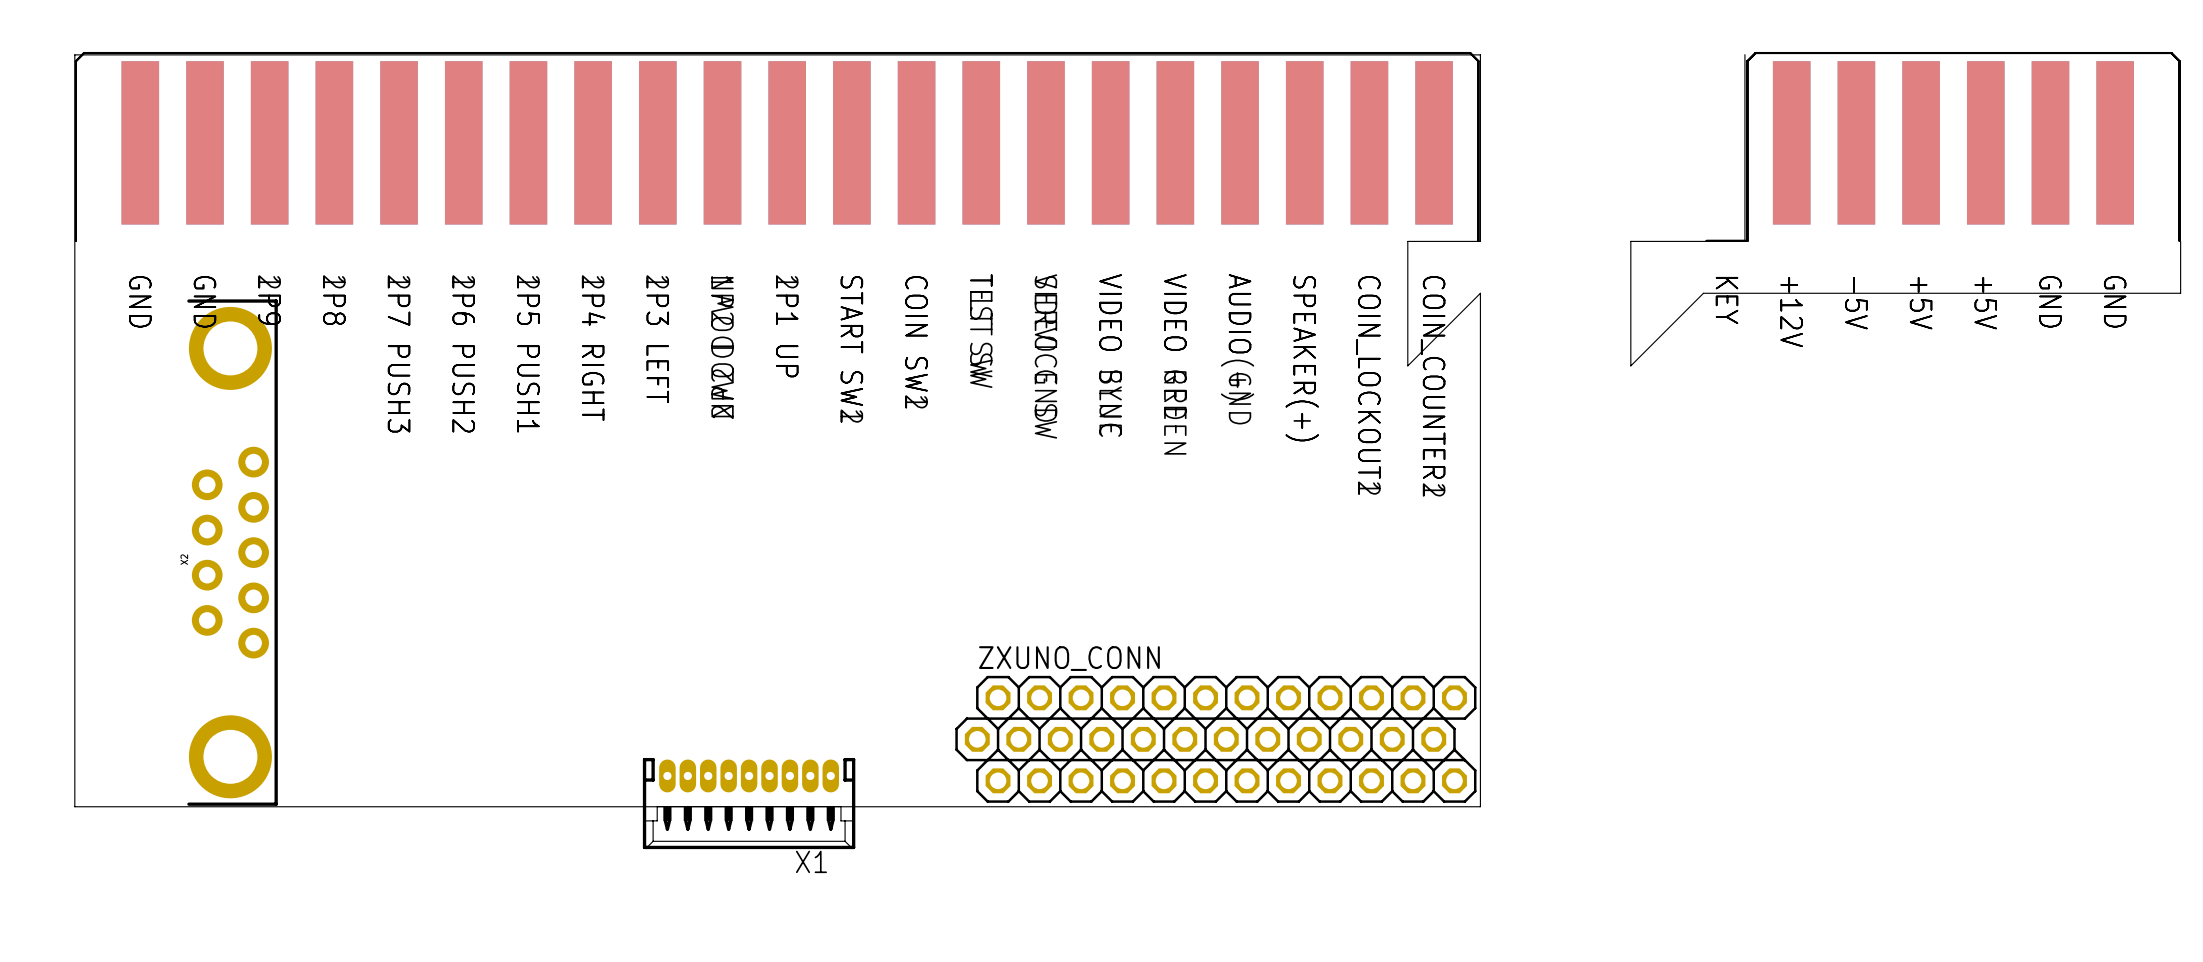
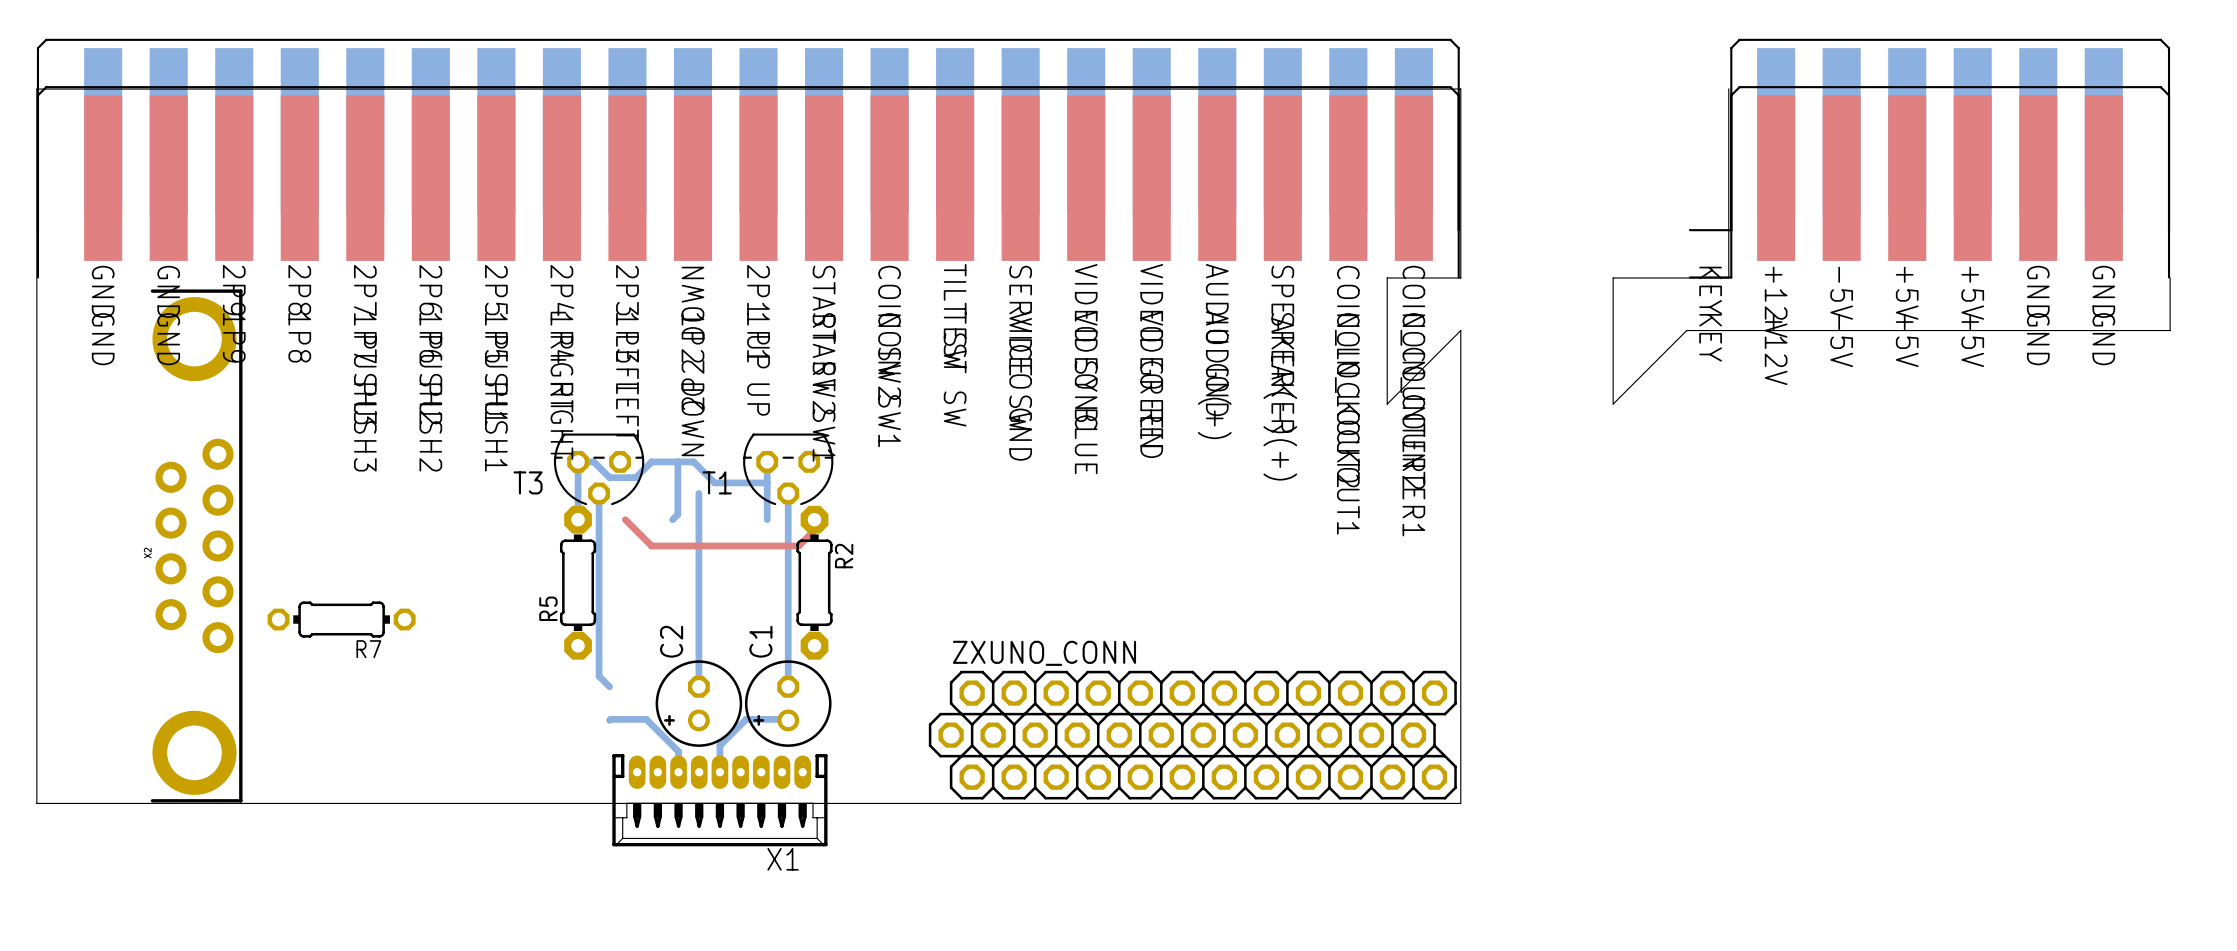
board edge: (1480, 54) (74, 54) (74, 101) -> (1460, 89) (36, 89)
board edge: (1480, 54) (1480, 101) -> none
board edge: (1744, 54) (1744, 101) -> none
part position: (777, 146) -> (748, 182)
part position: (1943, 146) -> (1929, 182)
board edge: (1480, 241) (1407, 241) (1407, 288) -> (1460, 230) (1460, 278) (1387, 278)
board edge: (1744, 241) (1630, 241) (1630, 288) -> (1728, 230) (1728, 278) (1613, 278)
board edge: (2180, 241) (2180, 288) -> none
board edge: (2180, 293) (1703, 293) (1630, 365) -> (2170, 283) (2170, 330) (1686, 330) (1613, 404) (1613, 356)
board edge: (1480, 339) (1480, 293) (1407, 365) -> (1460, 330) (1387, 404) (1387, 356)
bottom track: none -> (677, 461) (677, 514) (672, 519)
bottom track: none -> (767, 461) (767, 519)
T3: none -> (599, 469)
T1: none -> (788, 469)
bottom track: none -> (767, 482) (714, 482) (693, 461) (651, 461) (635, 477) (609, 477) (593, 461) (578, 461) (578, 519)
bottom track: none -> (599, 493) (599, 676) (609, 686)
bottom track: none -> (698, 493) (698, 686)
bottom track: none -> (788, 493) (788, 686)
top track: none -> (625, 519) (651, 545) (798, 545) (814, 530) (814, 519)
R5: none -> (578, 582)
R2: none -> (814, 582)
R7: none -> (341, 619)
C2: none -> (698, 703)
C1: none -> (788, 703)
bottom track: none -> (609, 720) (646, 719) (678, 751) (678, 772)
bottom track: none -> (788, 720) (746, 719) (719, 745) (719, 772)

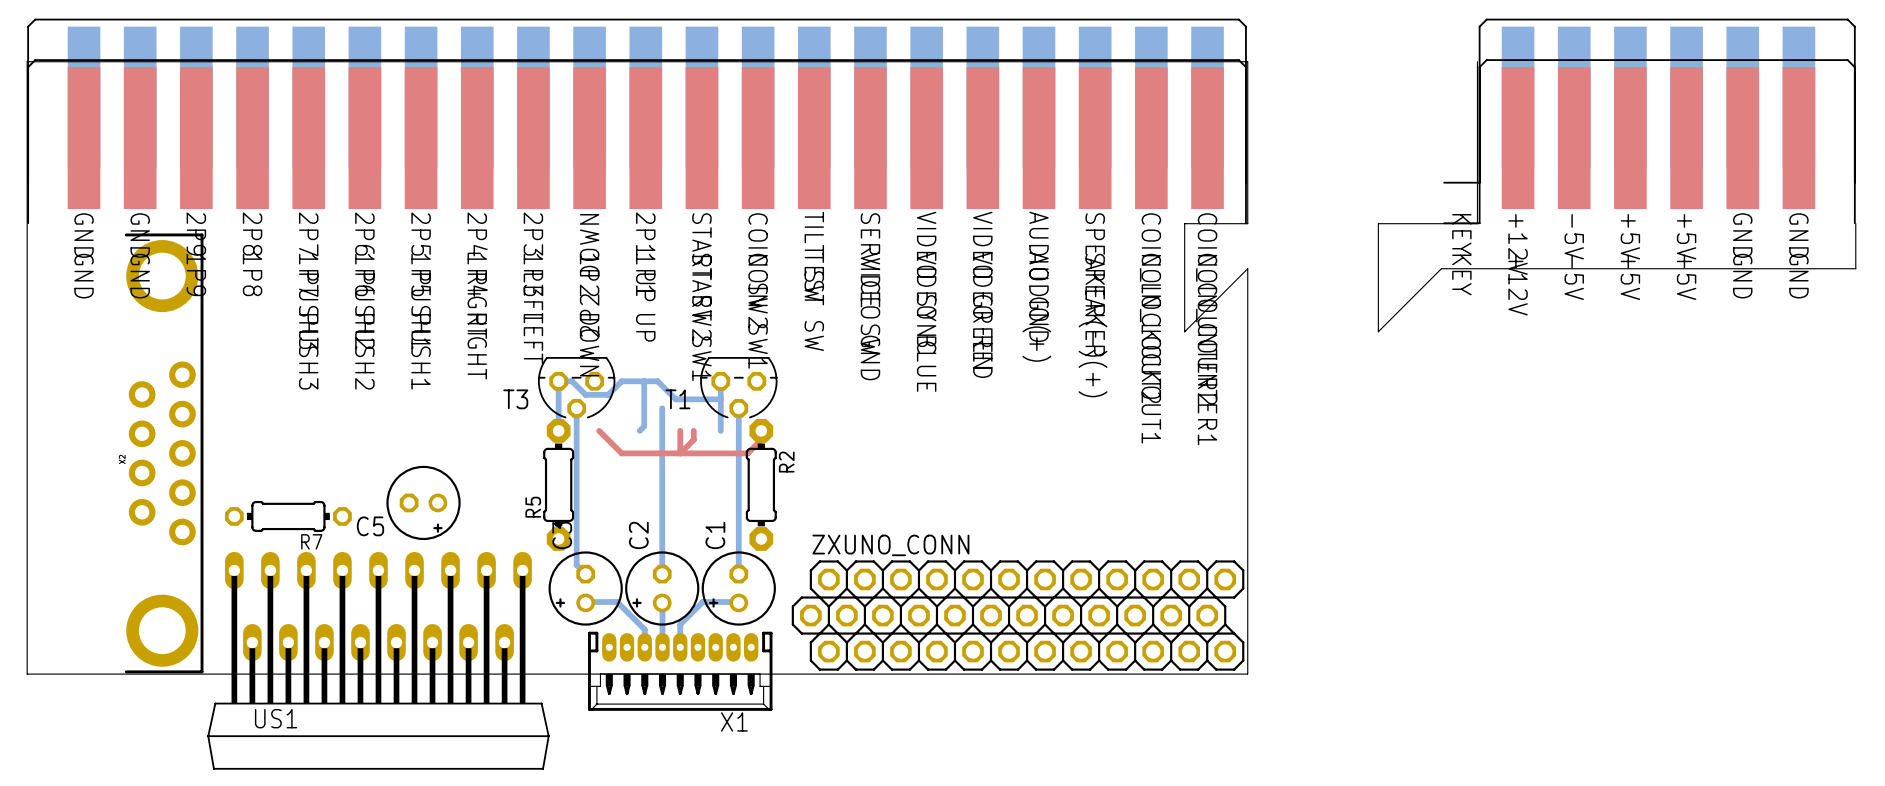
bottom track: (656, 461) (651, 461) (635, 477) (609, 477) (593, 461) (578, 461) (578, 519) -> (558, 381) (558, 430)
bottom track: (672, 461) (693, 461) (714, 482) (767, 482) -> (572, 381) (585, 394) (608, 394) (621, 381) (657, 381) (675, 399) (720, 399)
bottom track: (677, 461) (677, 493) -> none
bottom track: none -> (644, 381) (644, 426) (639, 430)
bottom track: (767, 461) (767, 519) -> (720, 381) (720, 430)
T3 position: (599, 469) -> (576, 387)
T1 position: (788, 469) -> (738, 387)
bottom track: (599, 493) (599, 676) (609, 686) -> none
bottom track: (698, 493) (698, 686) -> (662, 408) (662, 574)
bottom track: (788, 493) (788, 686) -> (738, 408) (738, 574)
bottom track: (677, 514) (672, 519) -> (576, 426) (576, 565) (585, 574)
top track: (625, 519) (651, 545) (730, 545) -> (599, 430) (621, 453)
top track: none -> (680, 430) (680, 453) (747, 453) (761, 439) (761, 430)
R5 position: (578, 582) -> (558, 484)
R2 position: (814, 582) -> (761, 484)
C5: none -> (423, 502)
C3: none -> (585, 588)
C2 position: (698, 703) -> (662, 588)
C1 position: (788, 703) -> (738, 588)
bottom track: (609, 720) (646, 719) (678, 751) (678, 772) -> (585, 602) (617, 602) (644, 629) (644, 647)
bottom track: none -> (662, 602) (662, 647)
bottom track: (788, 720) (746, 719) (719, 745) (719, 772) -> (738, 602) (702, 602) (680, 624) (680, 647)
US1: none -> (378, 660)
X1 position: (719, 800) -> (680, 671)

